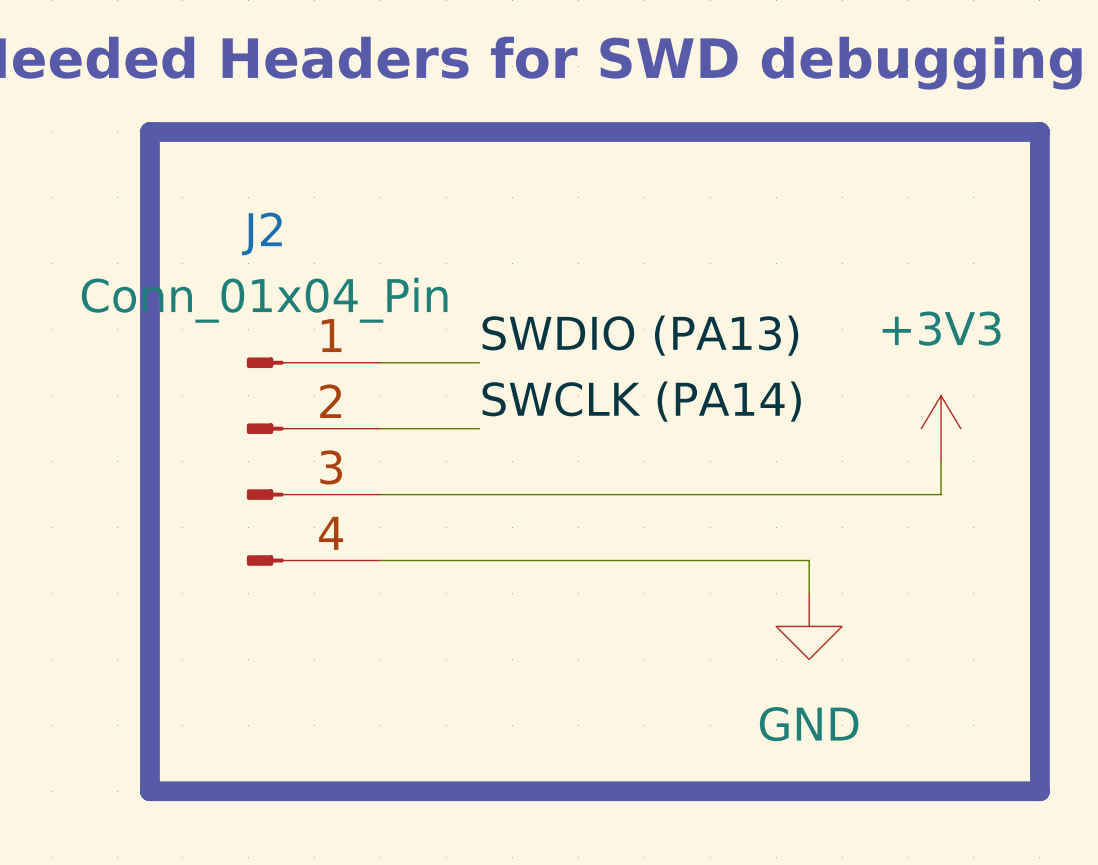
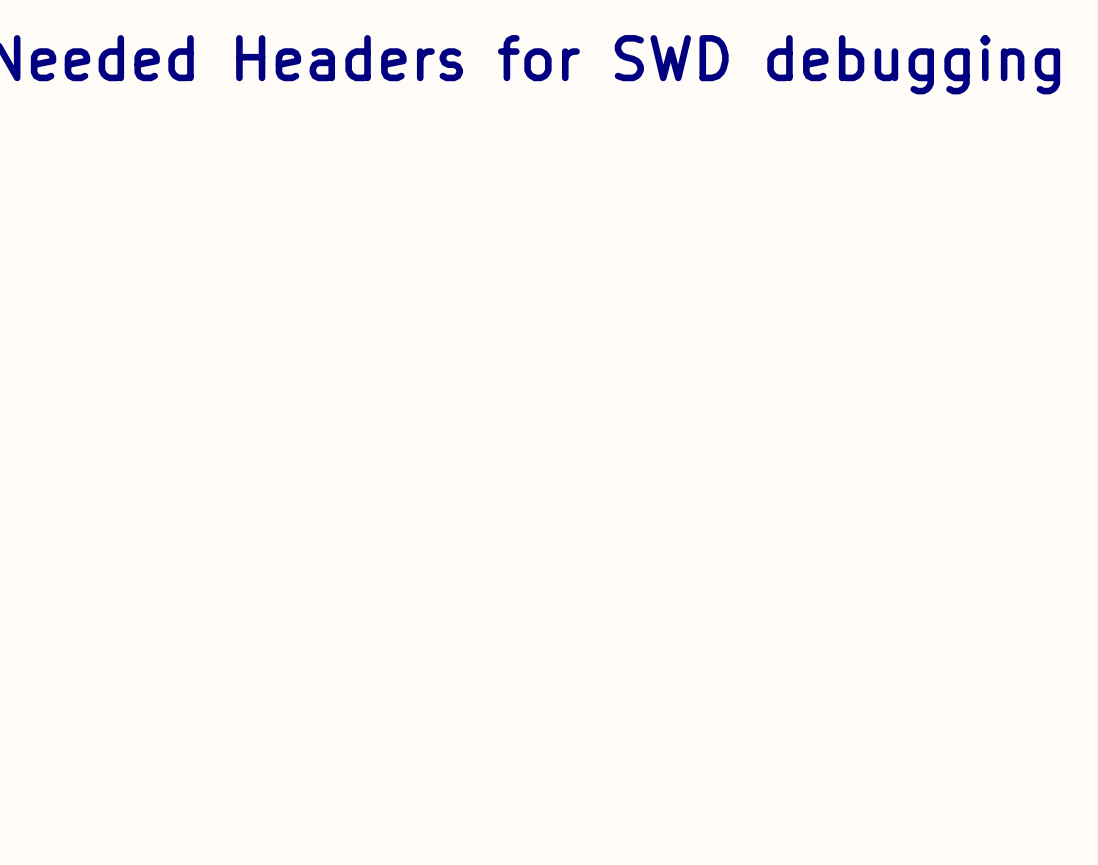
line: (149, 132) (1039, 132) (1039, 791) (149, 791) (149, 132) -> none
label: SWDIO (PA13) (640, 335) -> none
wire: (380, 362) (479, 362) -> none
label: SWCLK (PA14) (641, 401) -> none
wire: (380, 428) (479, 428) -> none
power symbol: +3V3 (941, 428) -> none
J2: Conn_01x04_Pin (313, 461) -> none
wire: (941, 461) (941, 494) (380, 494) -> none
wire: (380, 560) (809, 560) (809, 593) -> none
power symbol: GND (809, 626) -> none

